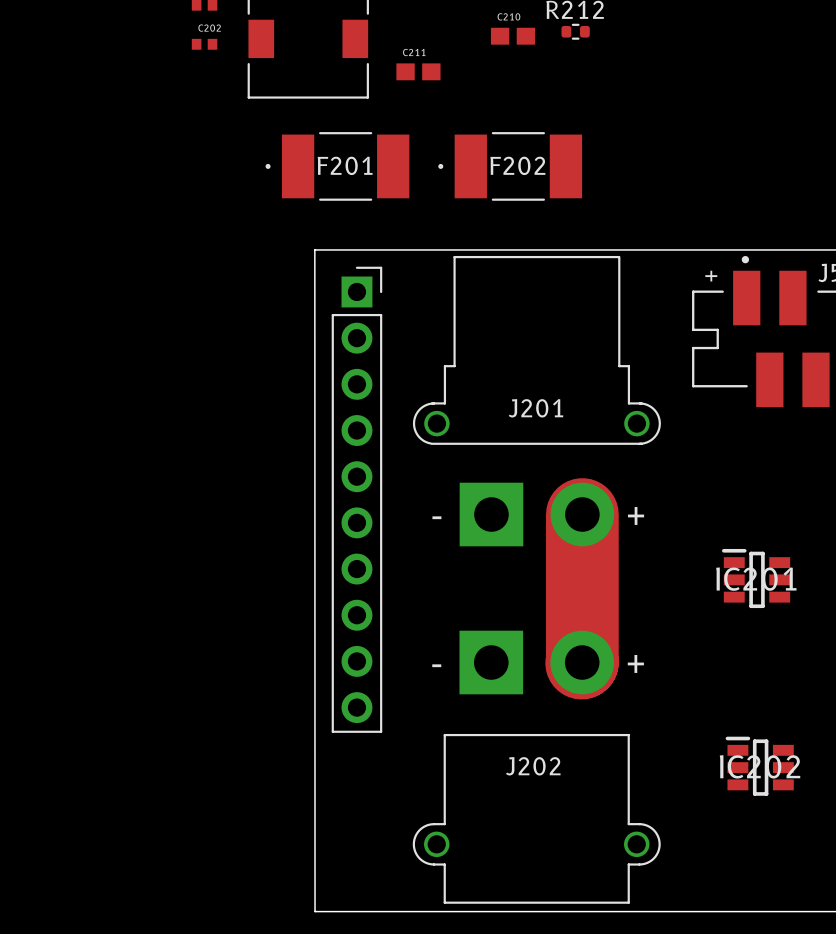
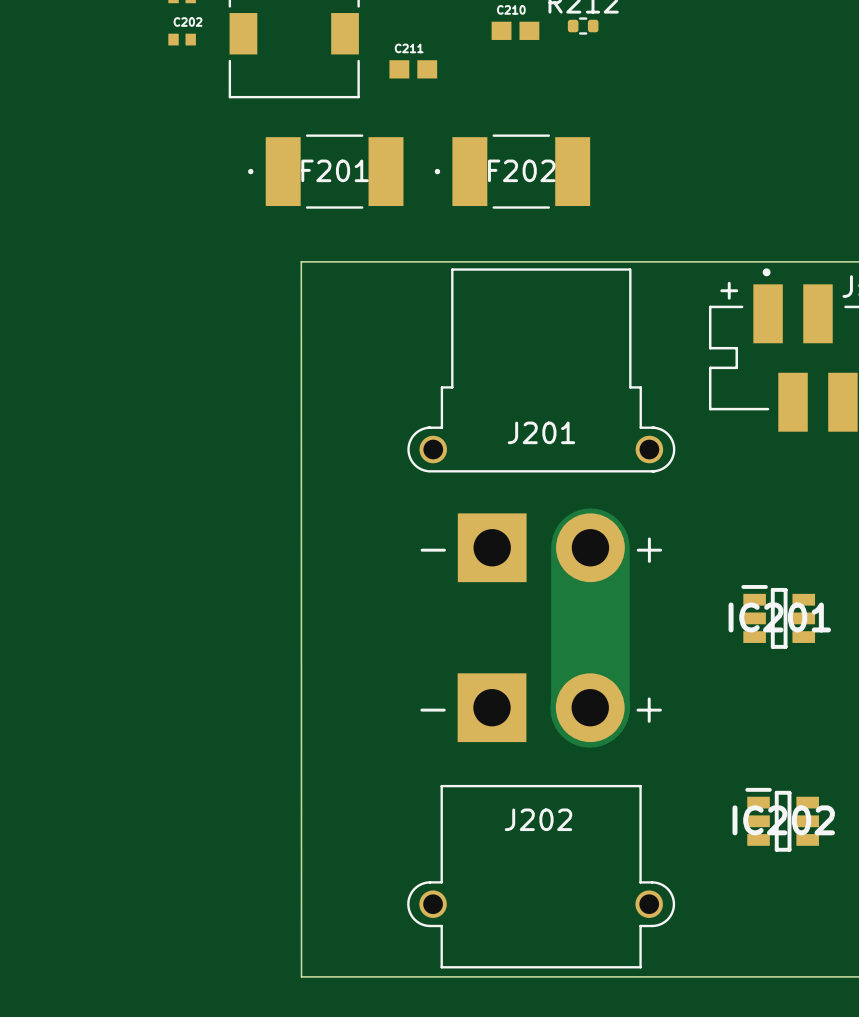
part: (356, 499) -> none

